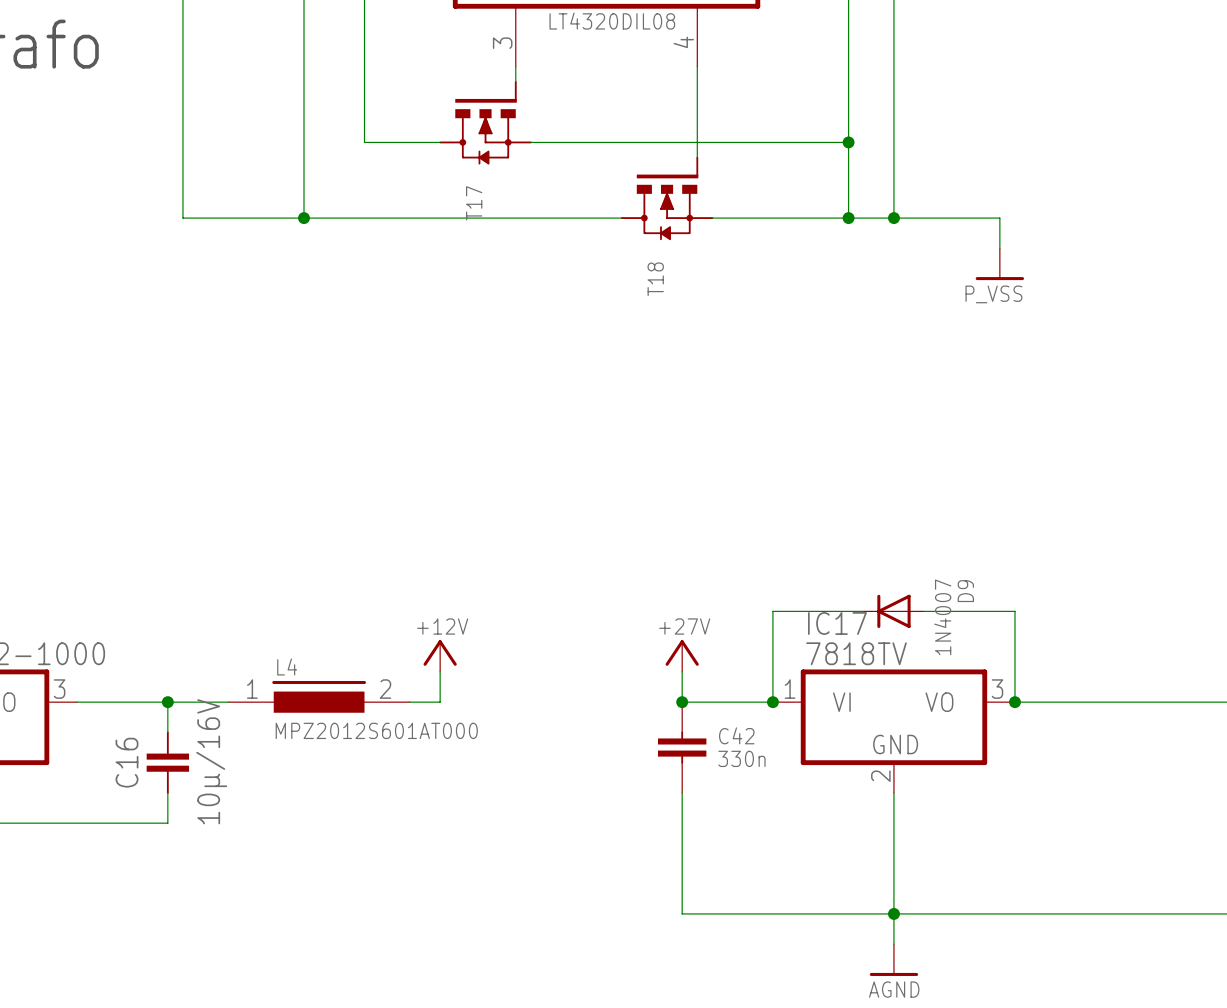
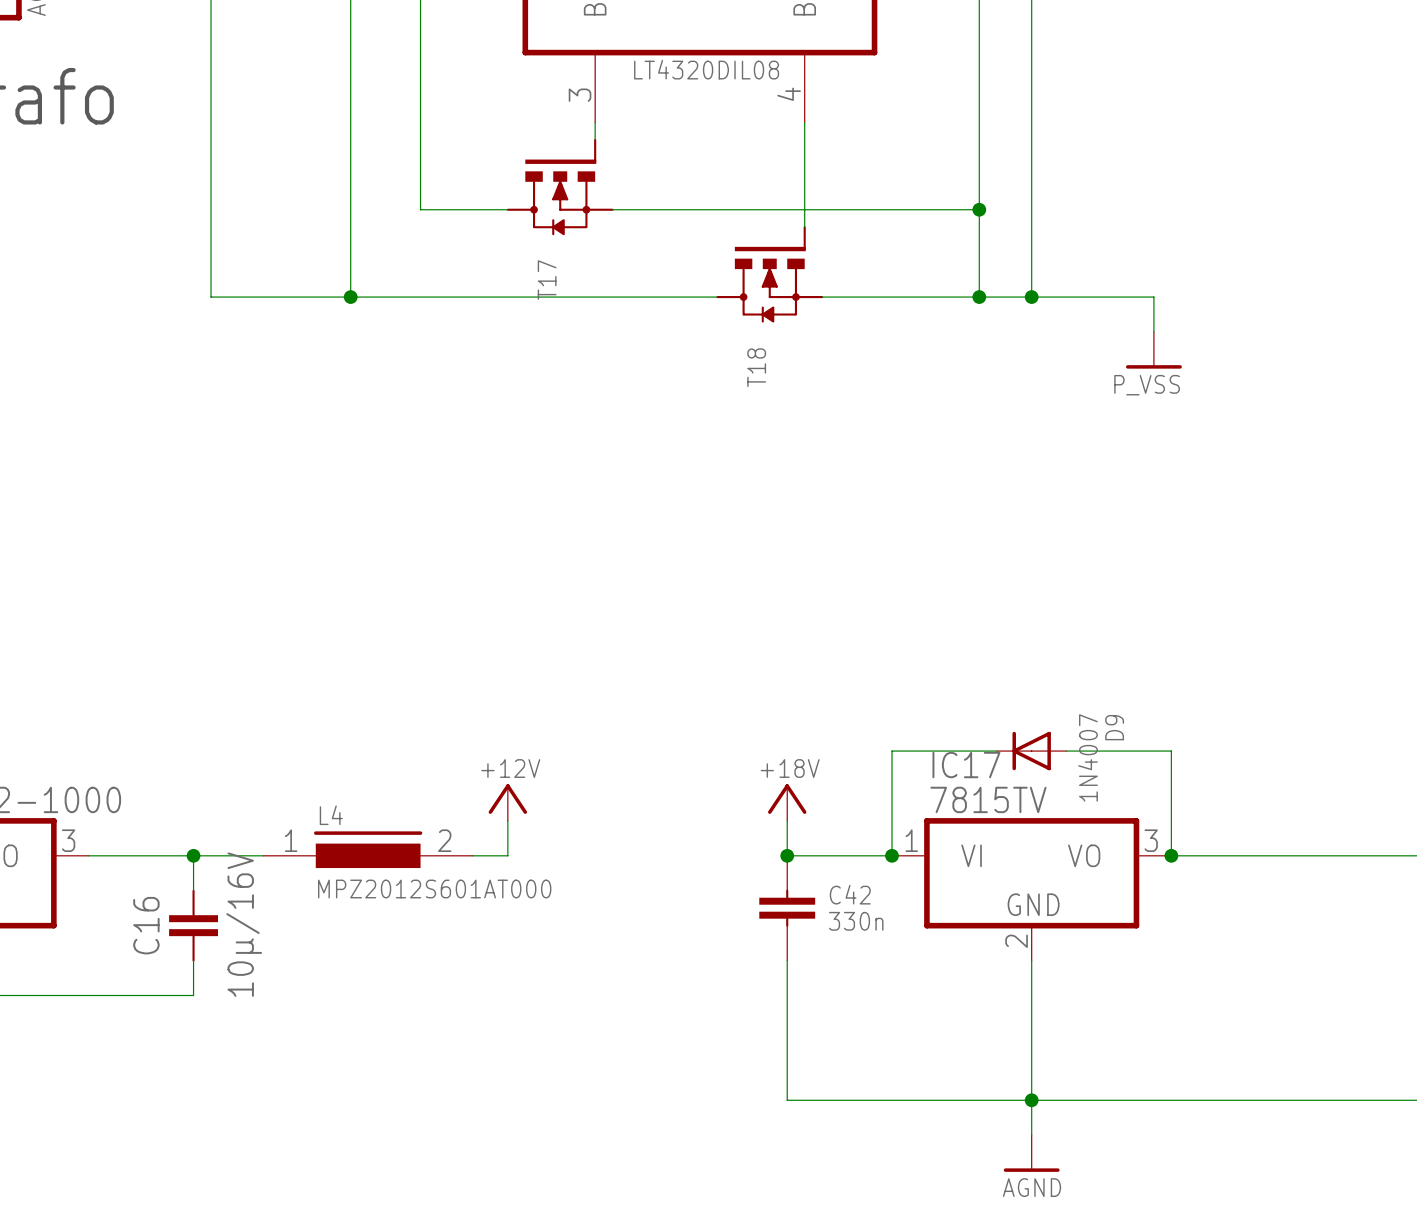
IC17 value: 7818TV (856, 653) -> 7815TV (988, 799)
power symbol: +27V (682, 656) -> +18V (787, 802)

